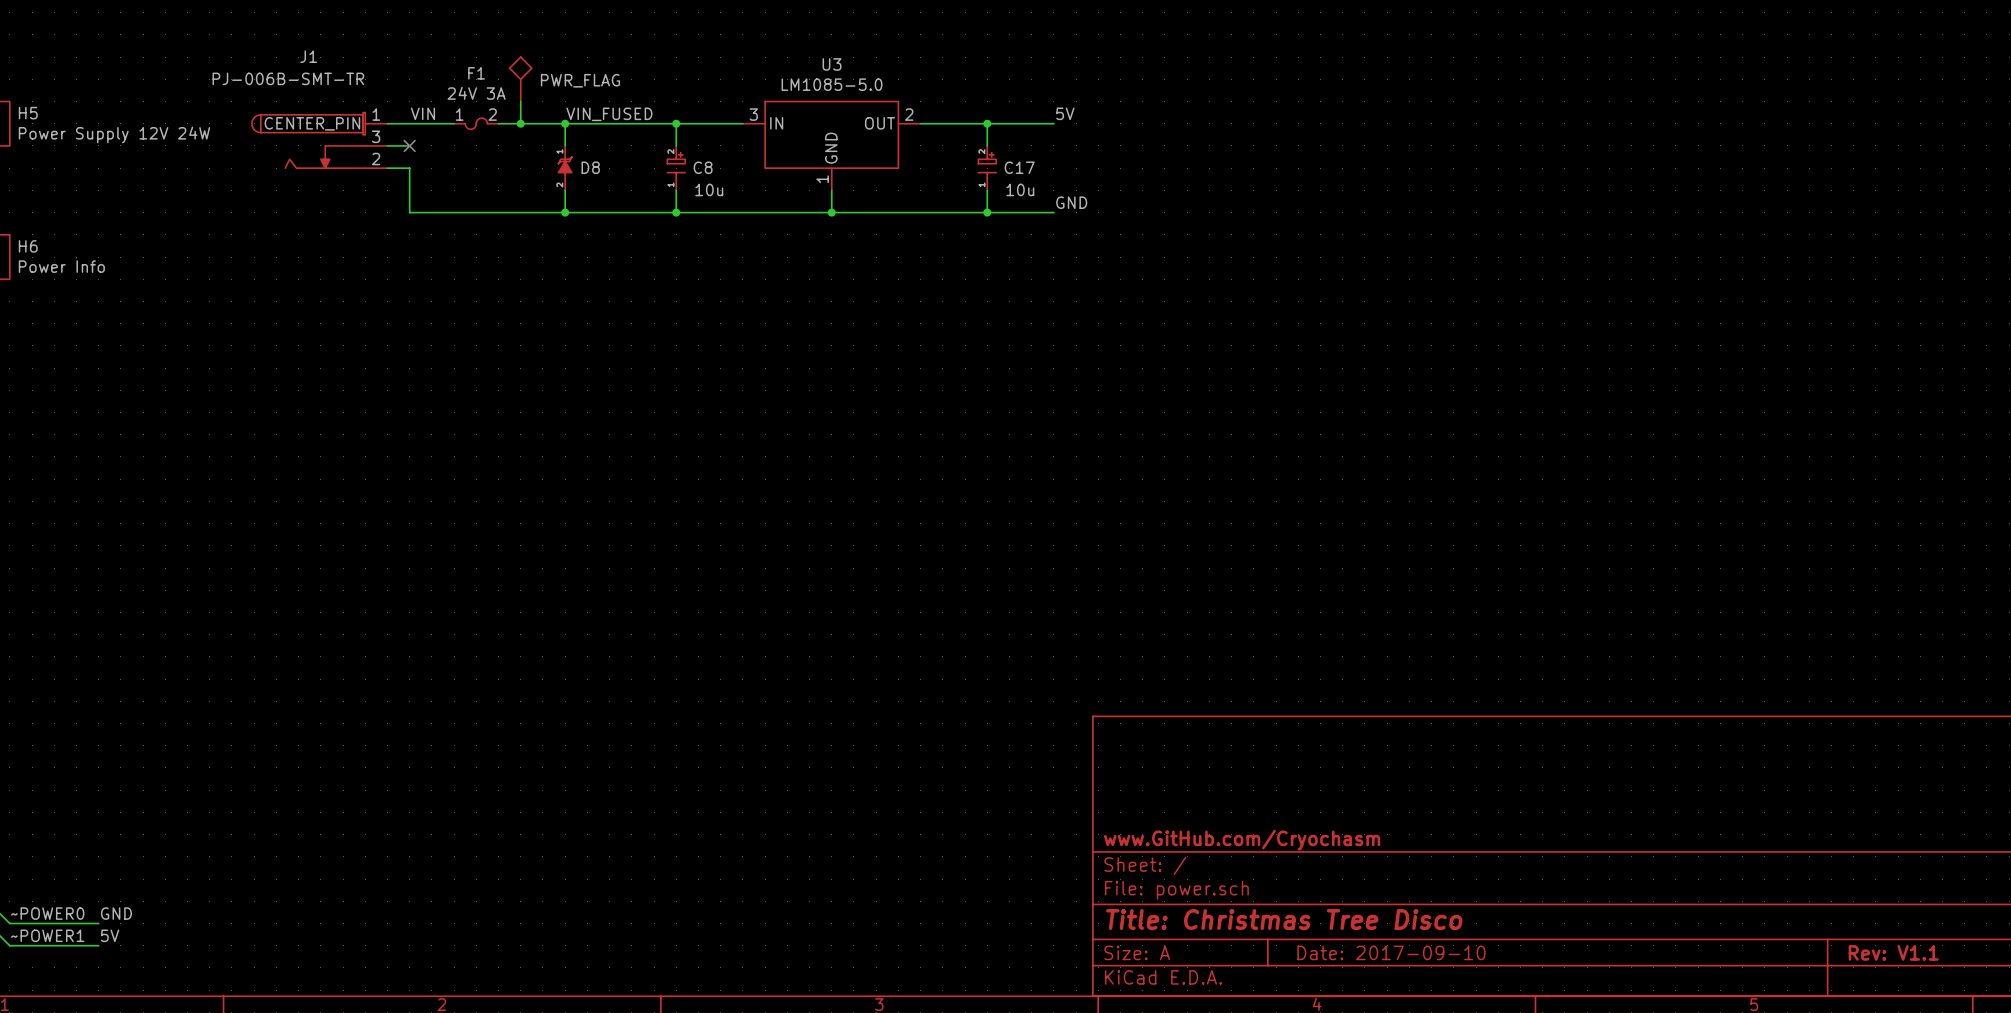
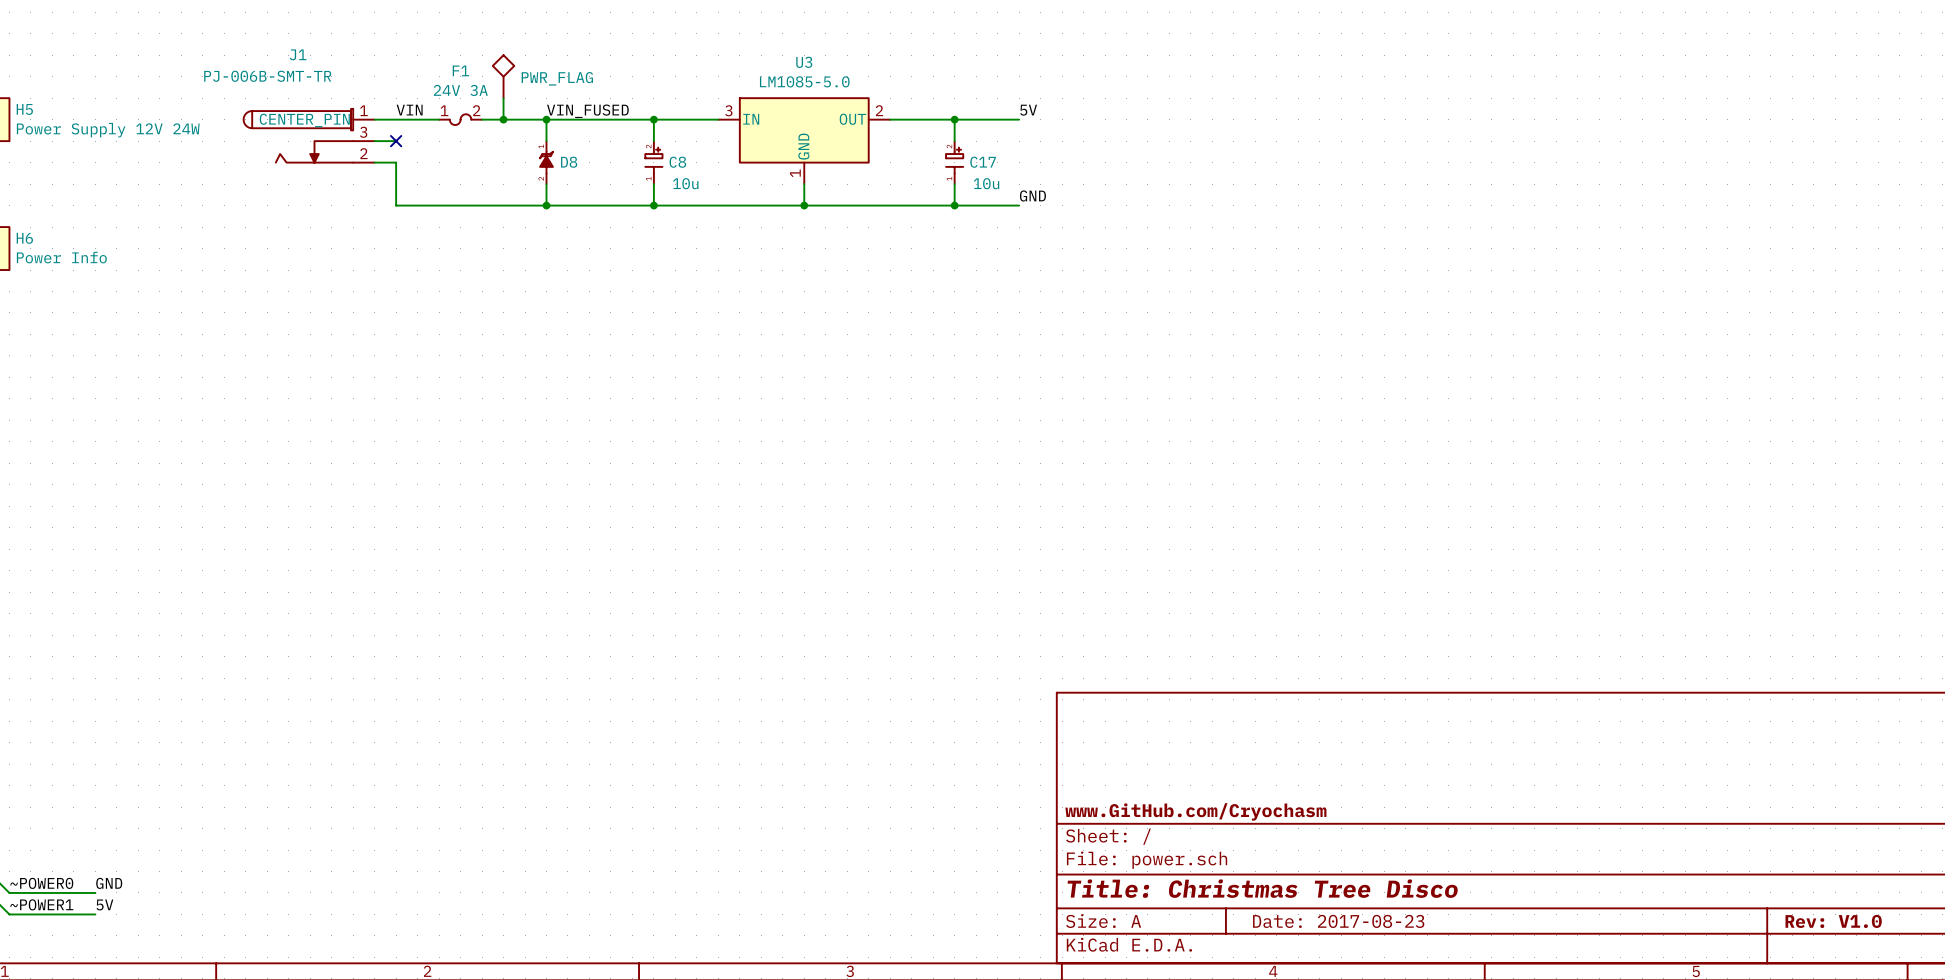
title block: Date: 2017-09-10 (1391, 952) -> Date: 2017-08-23 (1338, 921)
title block: Rev: V1.1 (1893, 952) -> Rev: V1.0 (1833, 921)

